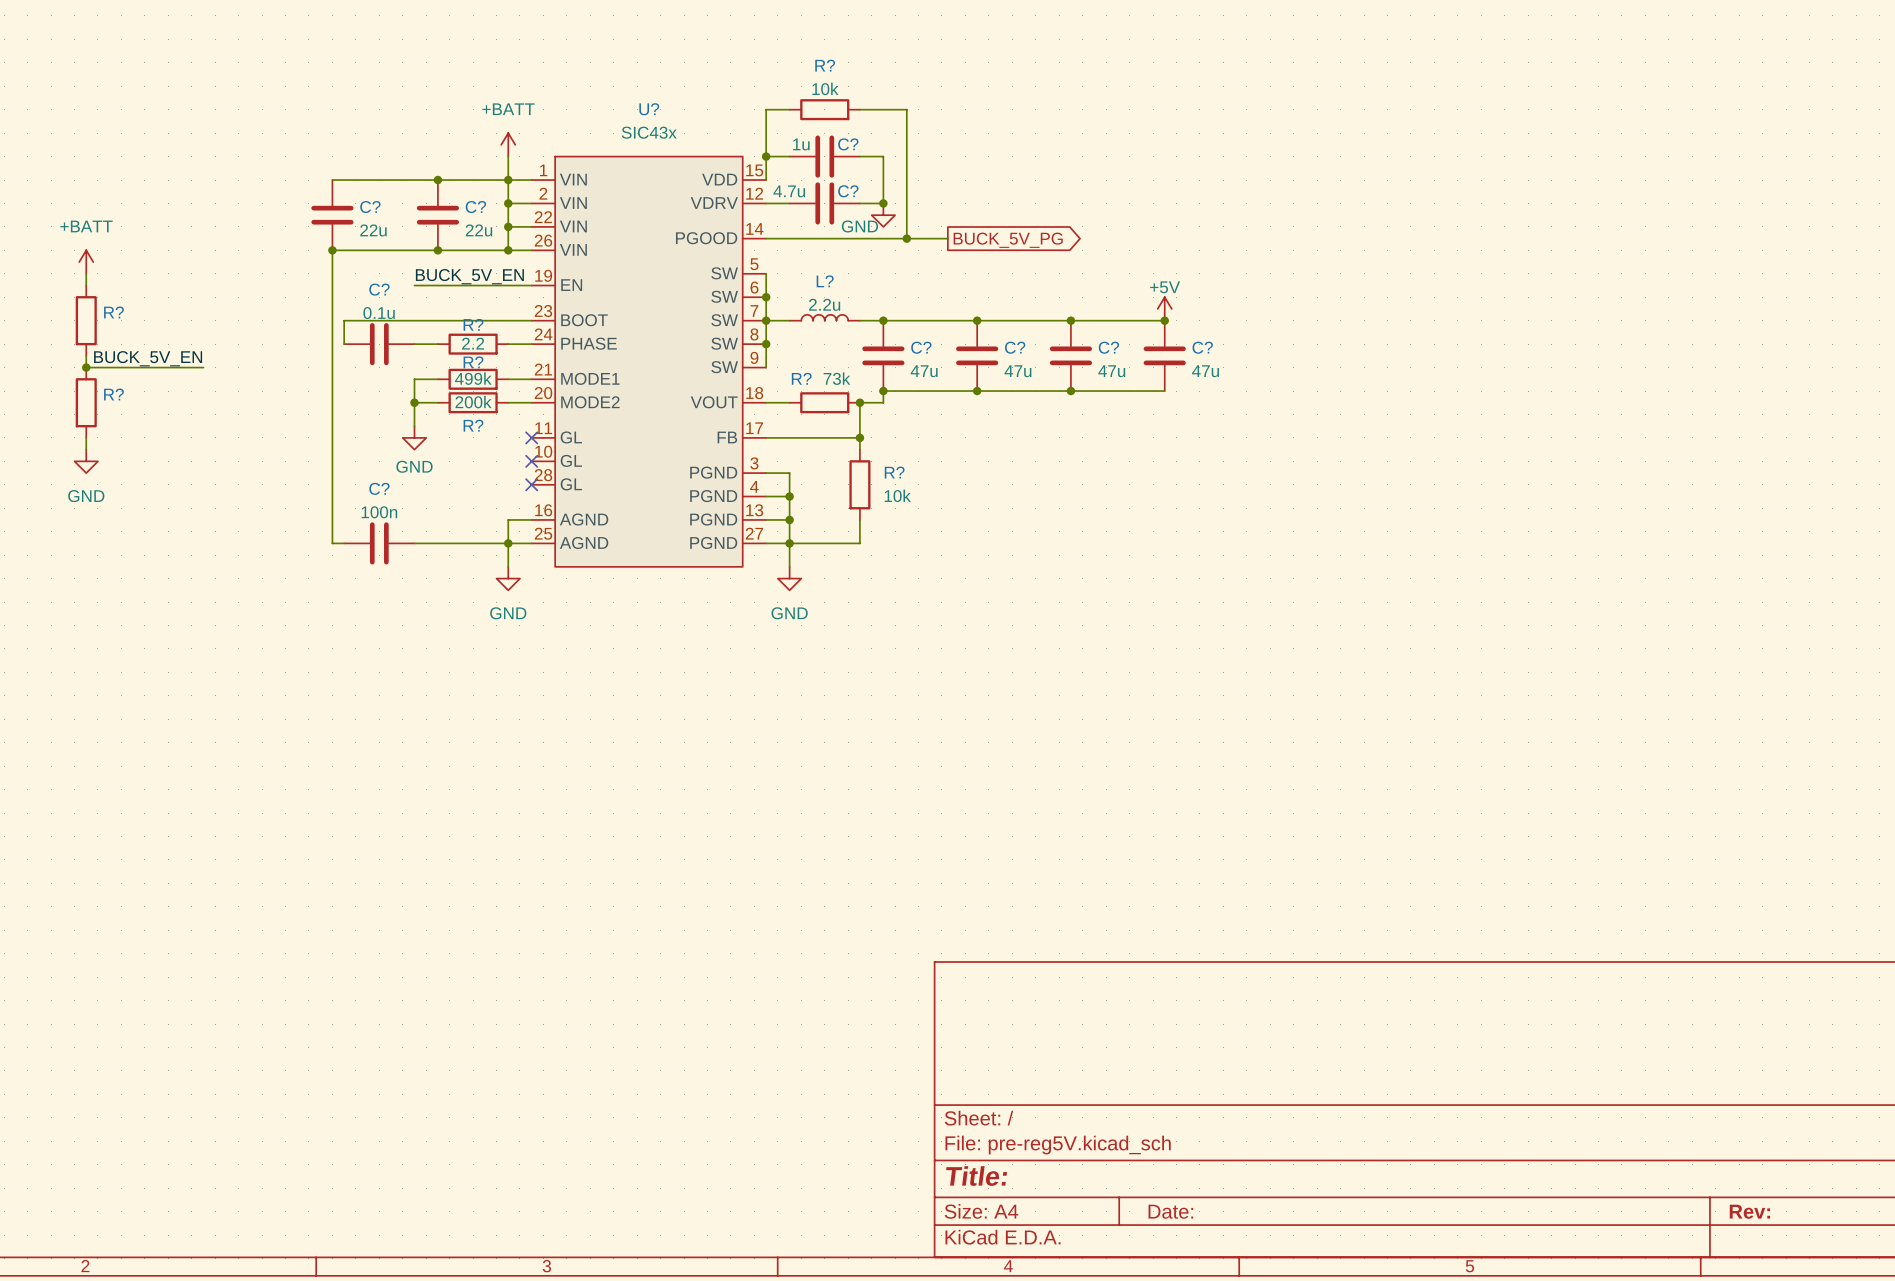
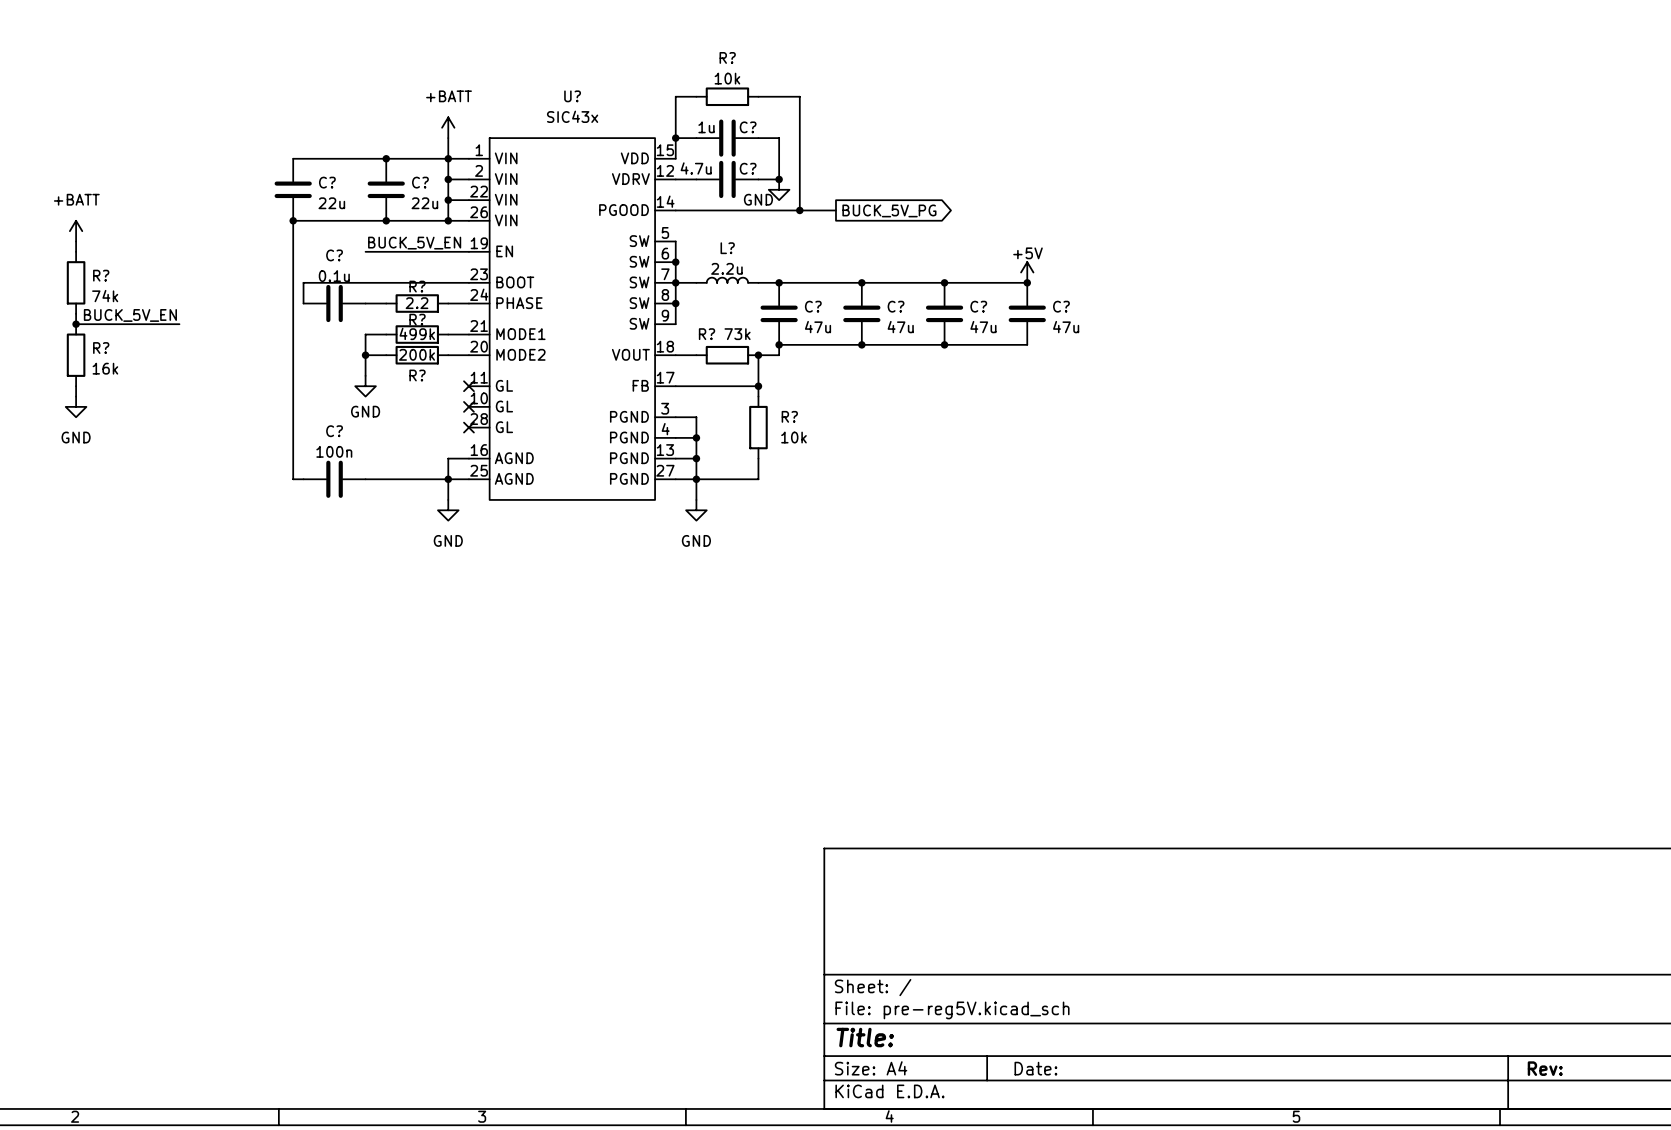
R? value: none -> 74k (105, 296)
R? value: none -> 16k (105, 368)

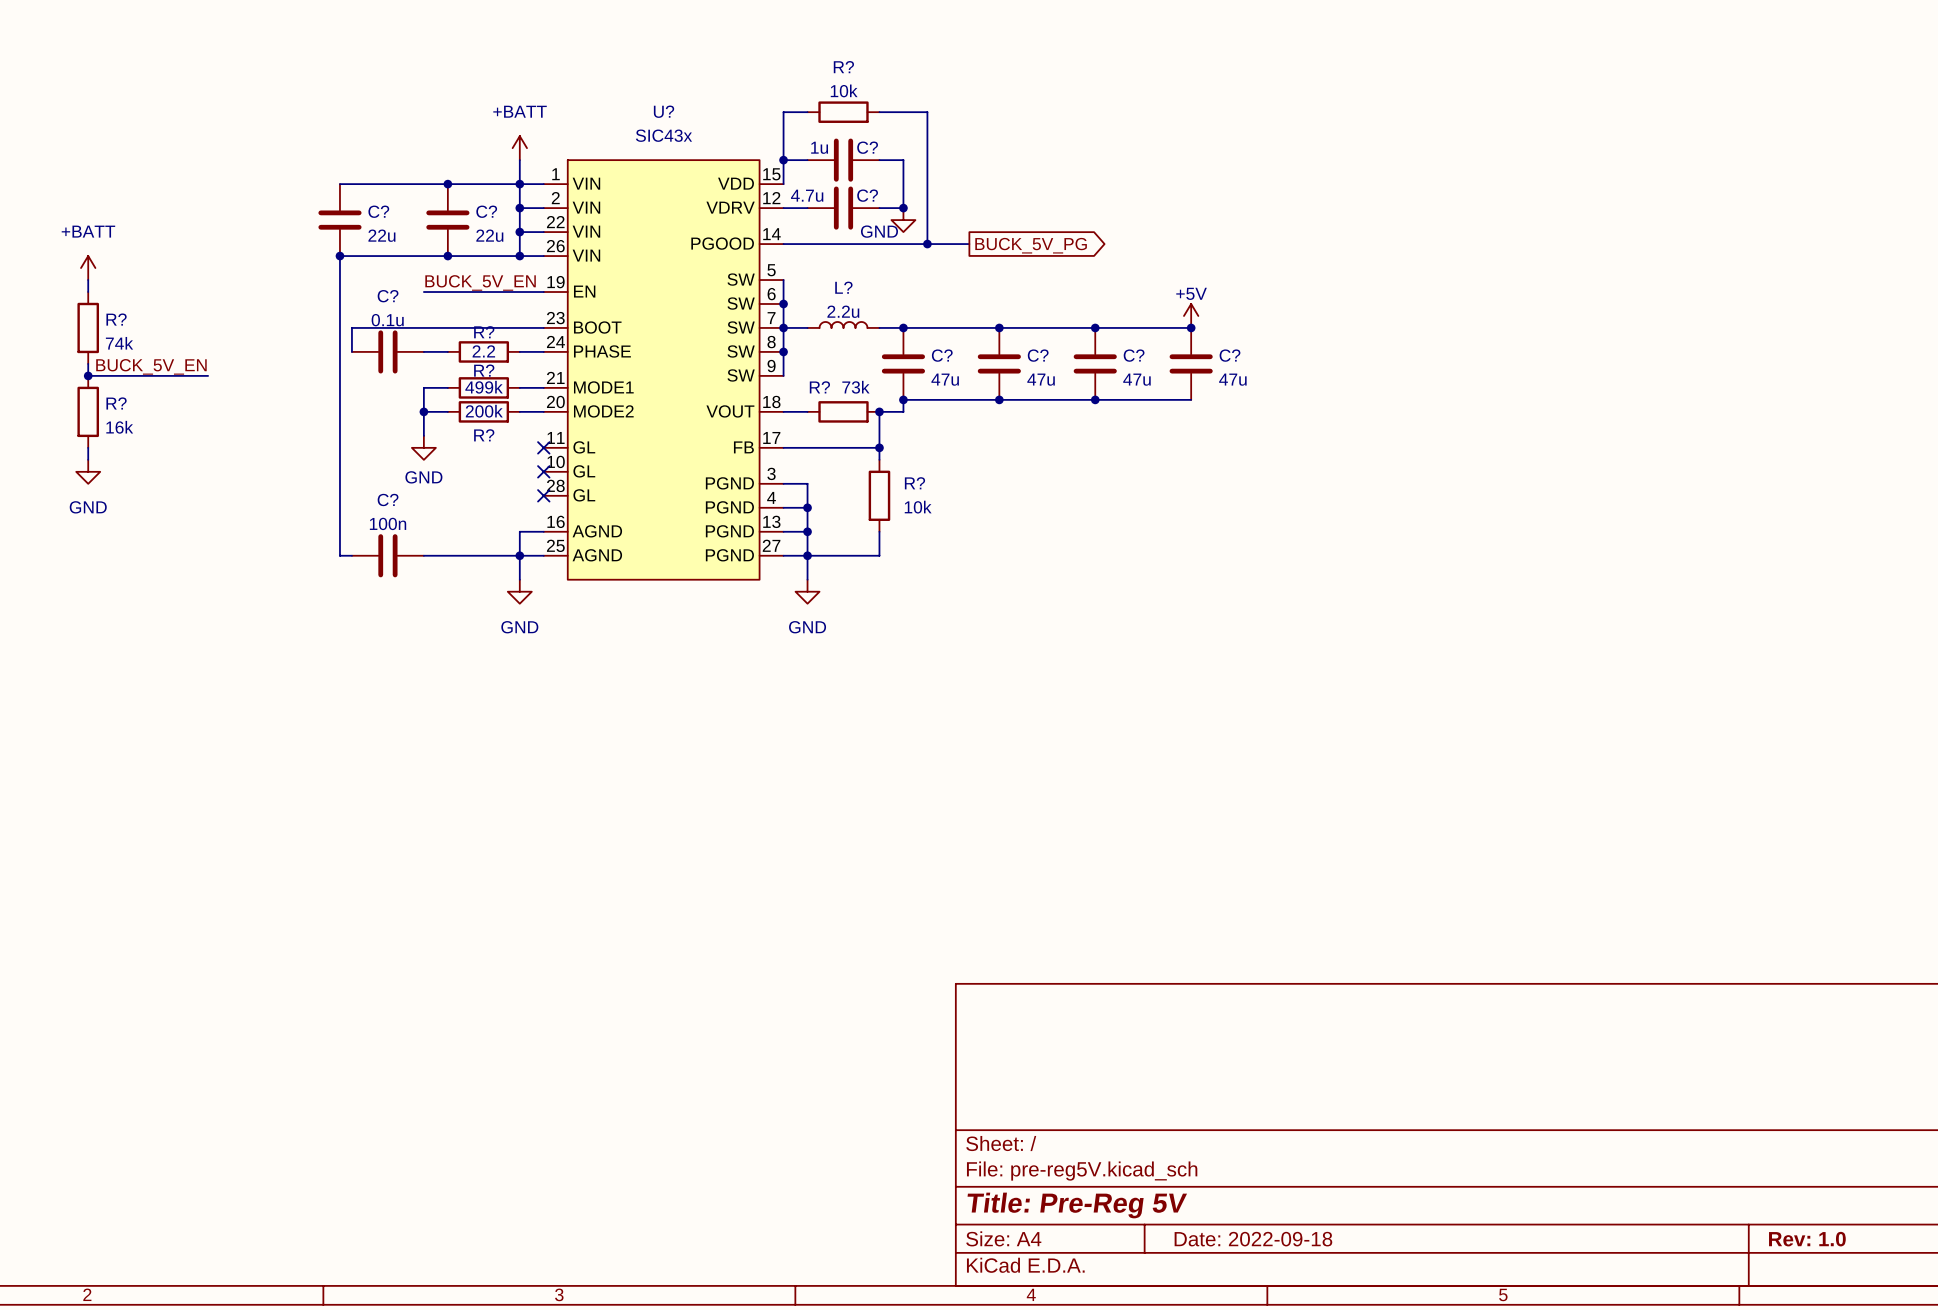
title block: Title: (865, 1037) -> Title: Pre-Reg 5V (1077, 1205)
title block: Date: (1035, 1068) -> Date: 2022-09-18 (1253, 1239)
title block: Rev: (1545, 1068) -> Rev: 1.0 (1807, 1239)

